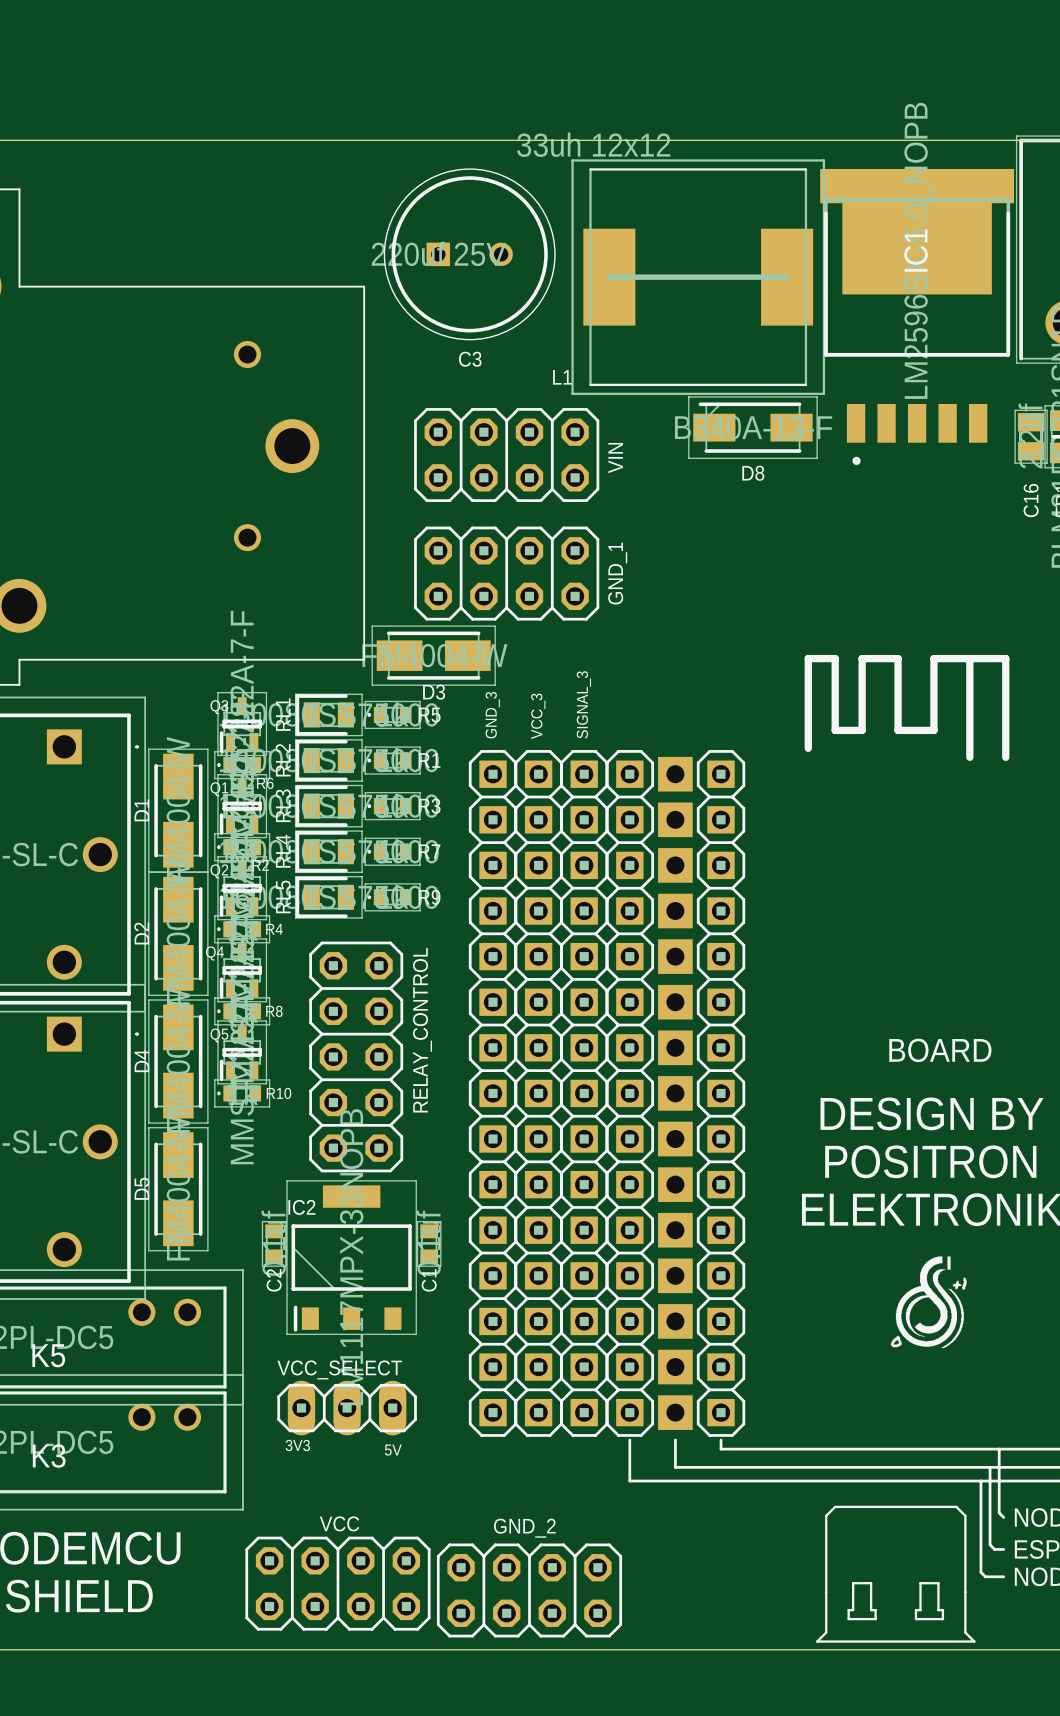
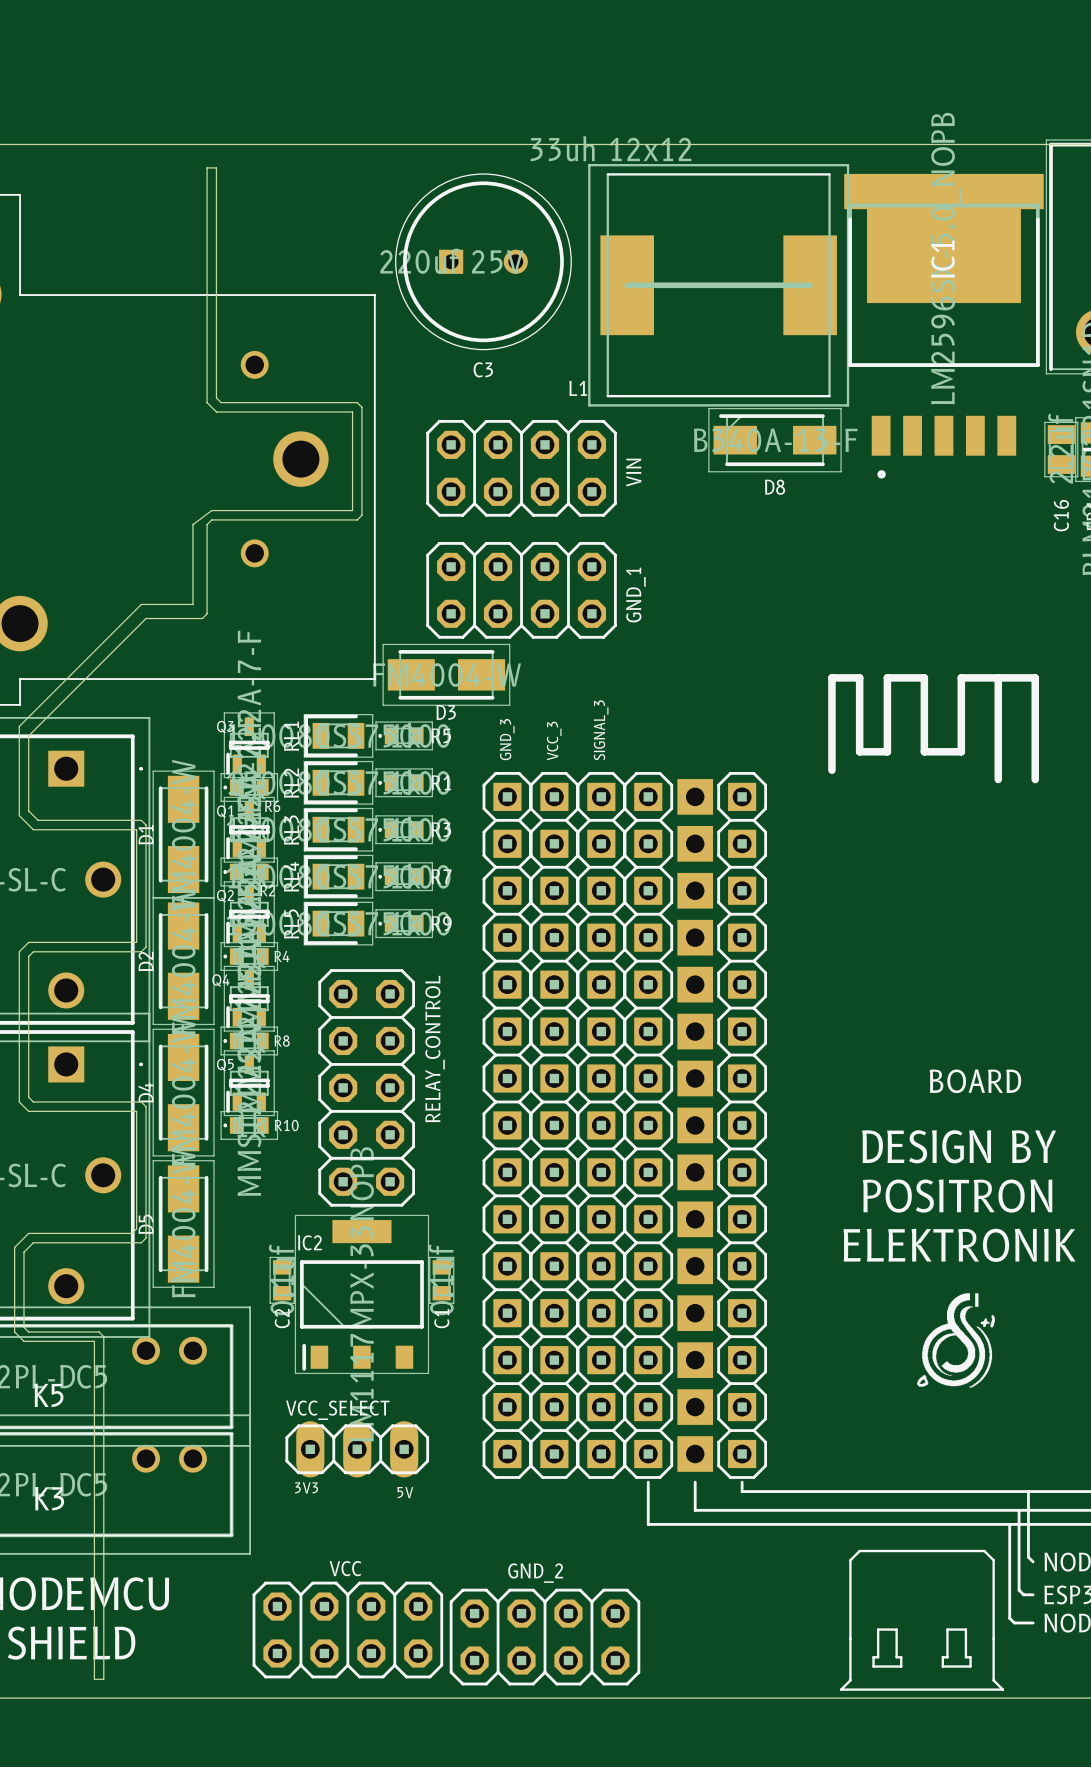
board edge: none -> (207, 167) (207, 402) (216, 412) (352, 412) (352, 510) (211, 510) (192, 524) (192, 604) (141, 604) (19, 726) (19, 815) (33, 829) (136, 829) (136, 942) (28, 942) (19, 951) (19, 1101) (28, 1111) (136, 1111) (136, 1228) (131, 1233) (28, 1233) (14, 1247) (14, 1331) (24, 1341) (94, 1341) (94, 1679) (103, 1679) (103, 1336) (99, 1331) (28, 1331) (24, 1327) (24, 1252) (33, 1242) (141, 1242) (146, 1238) (146, 1106) (141, 1101) (33, 1101) (28, 1097) (28, 956) (33, 951) (141, 951) (146, 947) (146, 825) (141, 820) (38, 820) (28, 810) (28, 735) (146, 618) (202, 618) (207, 613) (207, 524) (211, 519) (357, 519) (361, 515) (361, 407) (357, 402) (221, 402) (216, 397) (216, 167) (207, 167)

